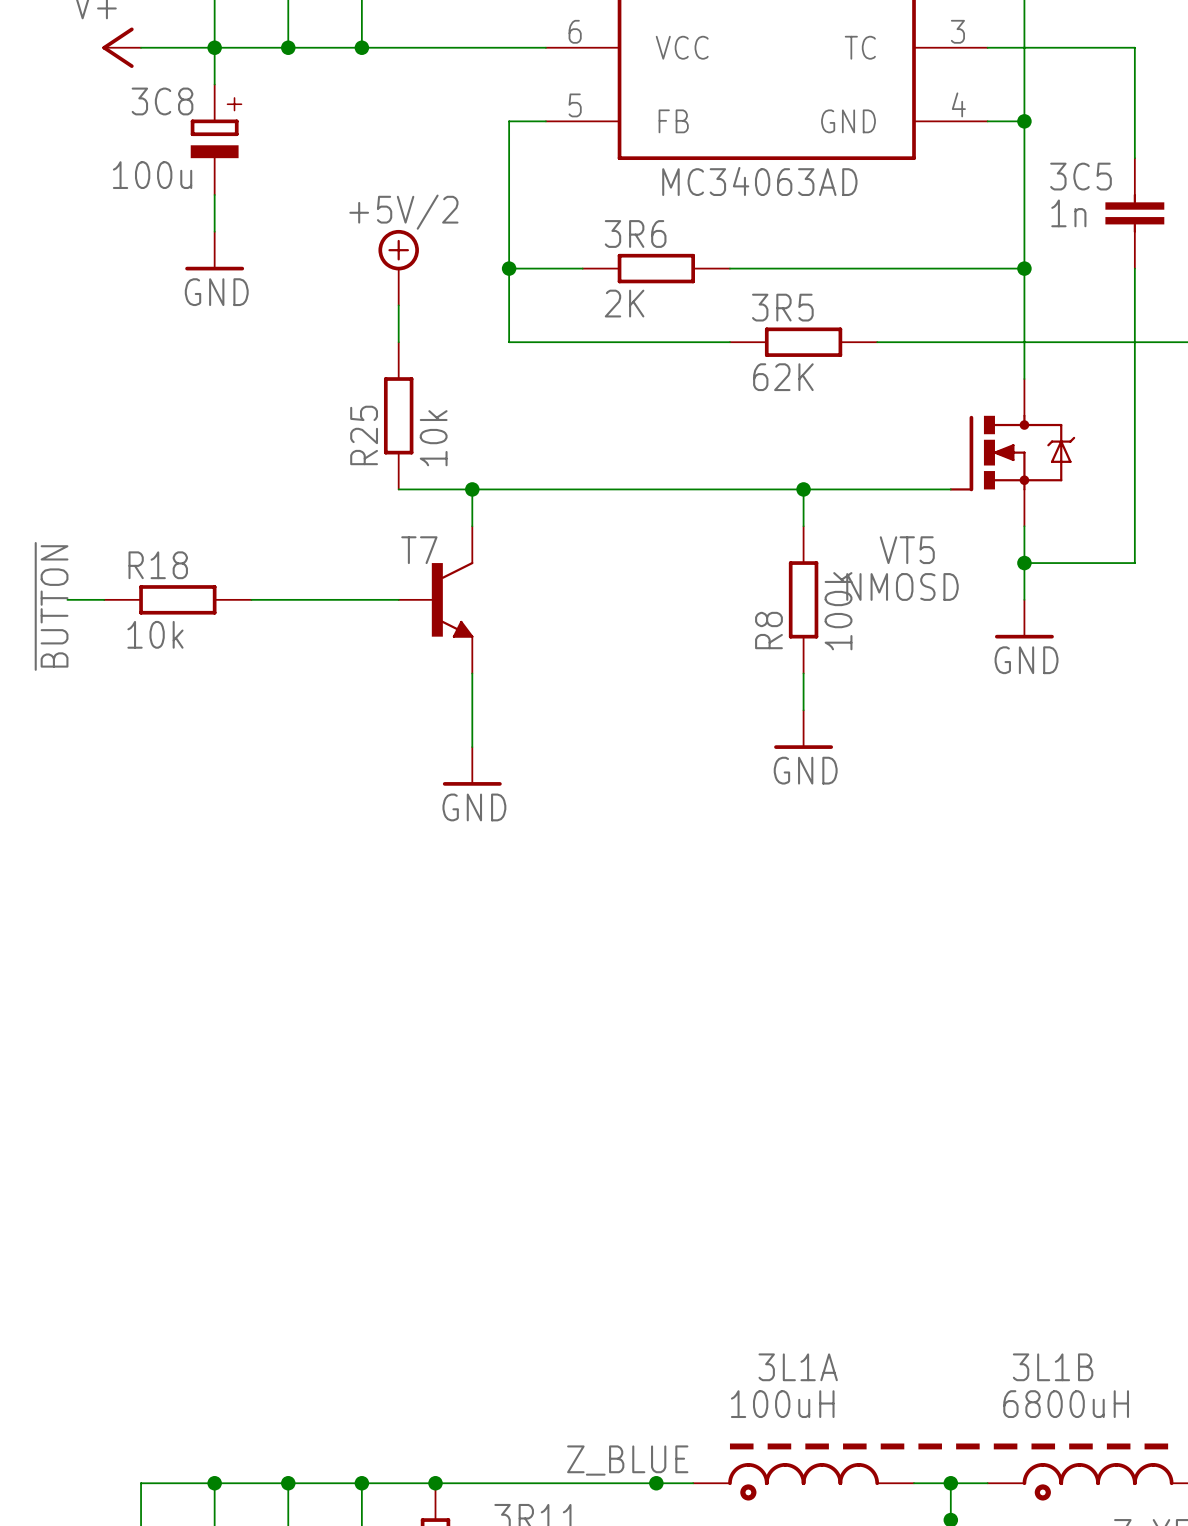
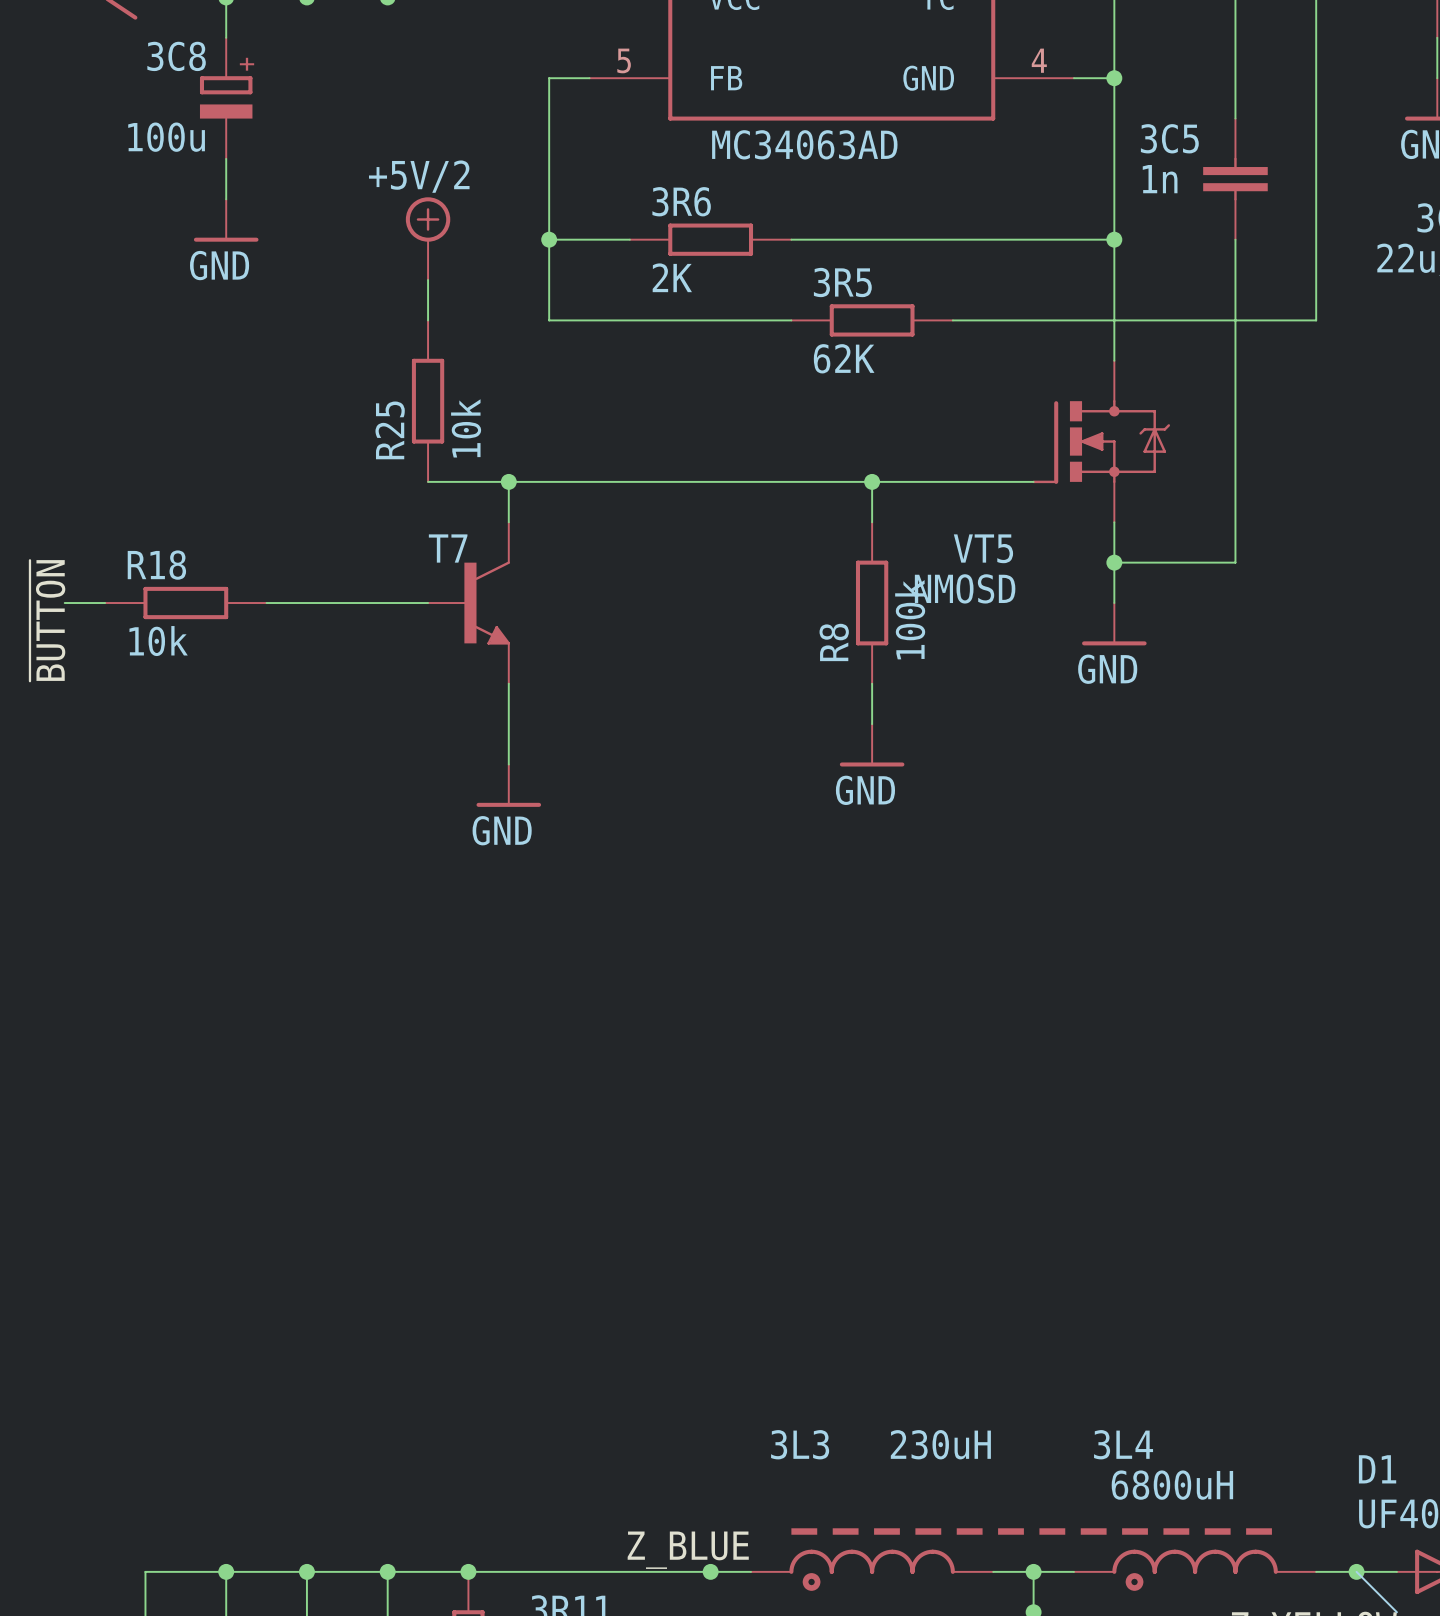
3L1A name: 3L1A (798, 1367) -> 3L3 (800, 1444)
3L1B name: 3L1B (1053, 1367) -> 3L4 (1123, 1444)
3L1A value: 100uH (782, 1404) -> 230uH (940, 1444)

